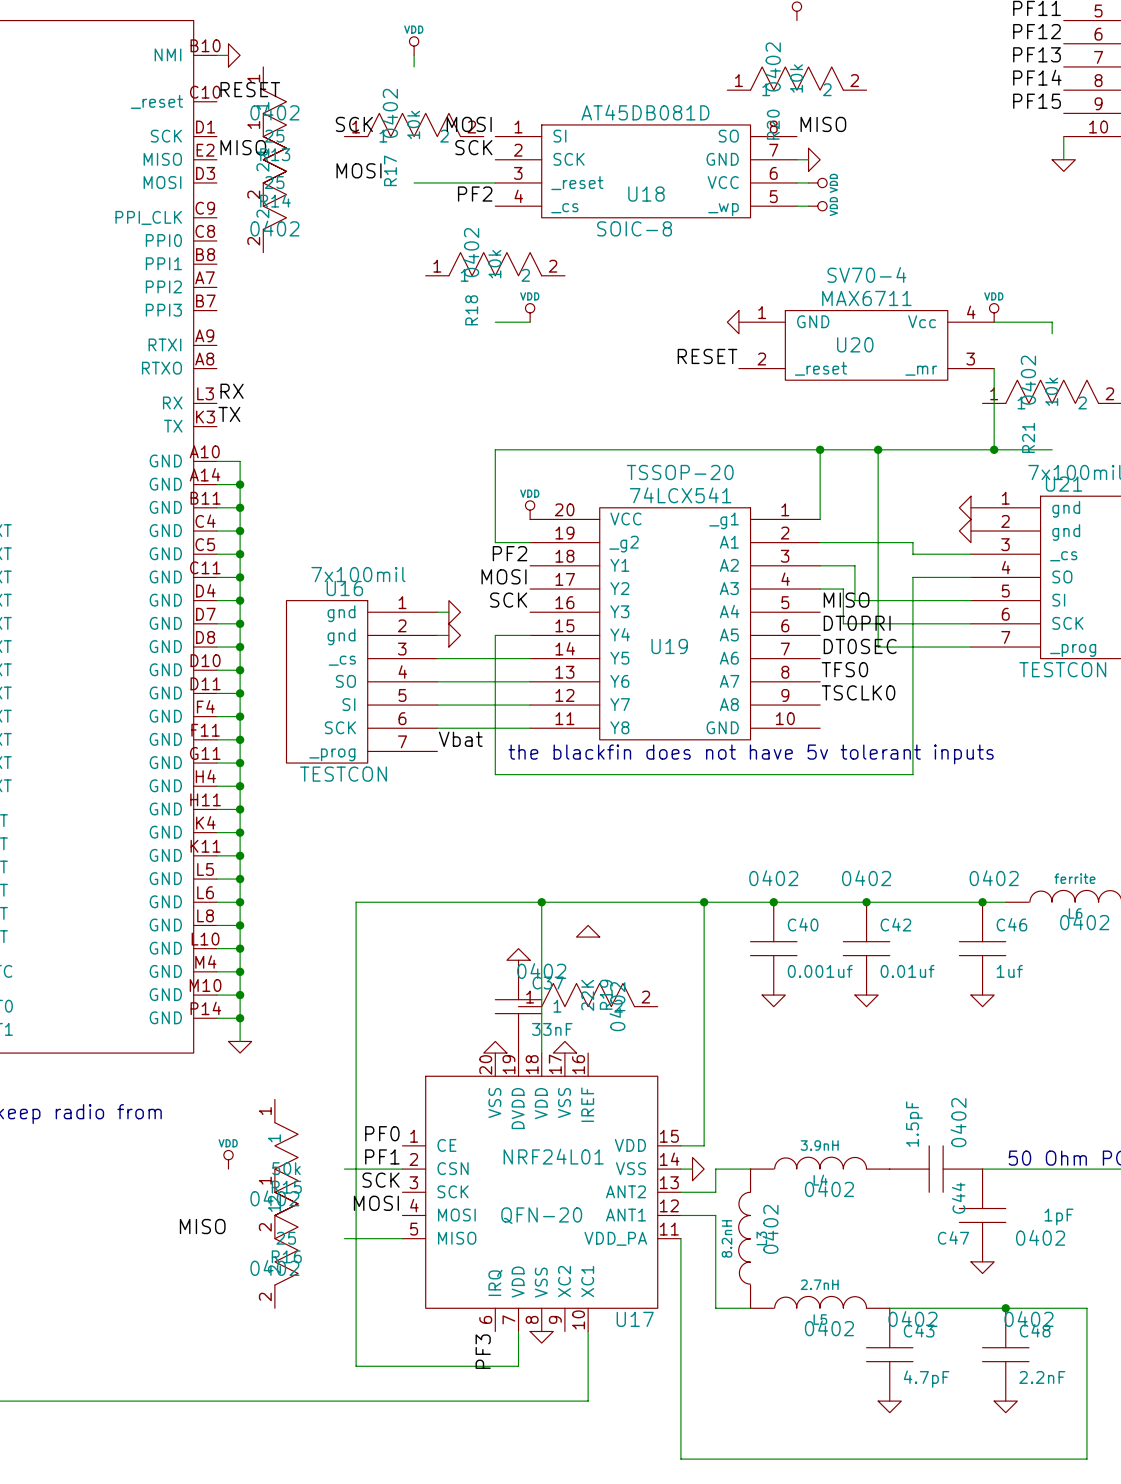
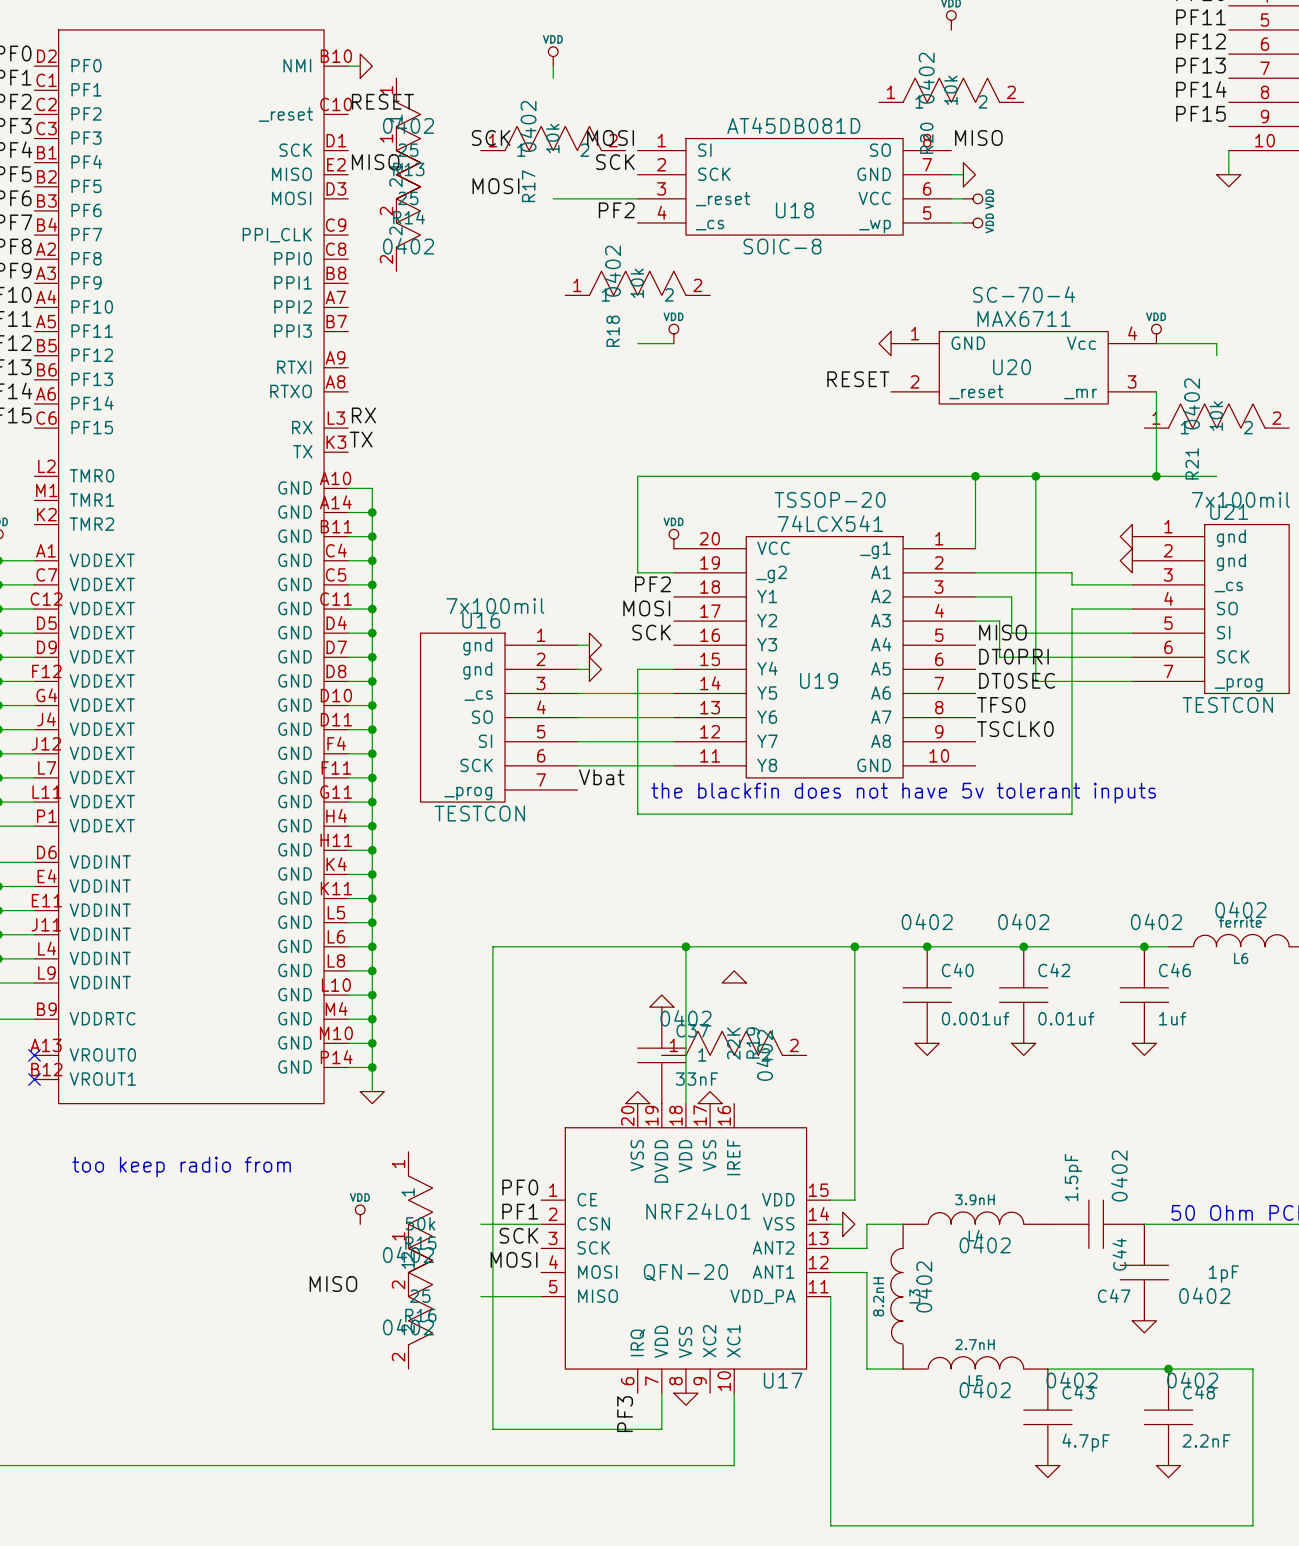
U20 text: SV70-4 (866, 274) -> SC-70-4 (1024, 294)
L6 text position: 0402 (1084, 922) -> 0402 (1240, 909)

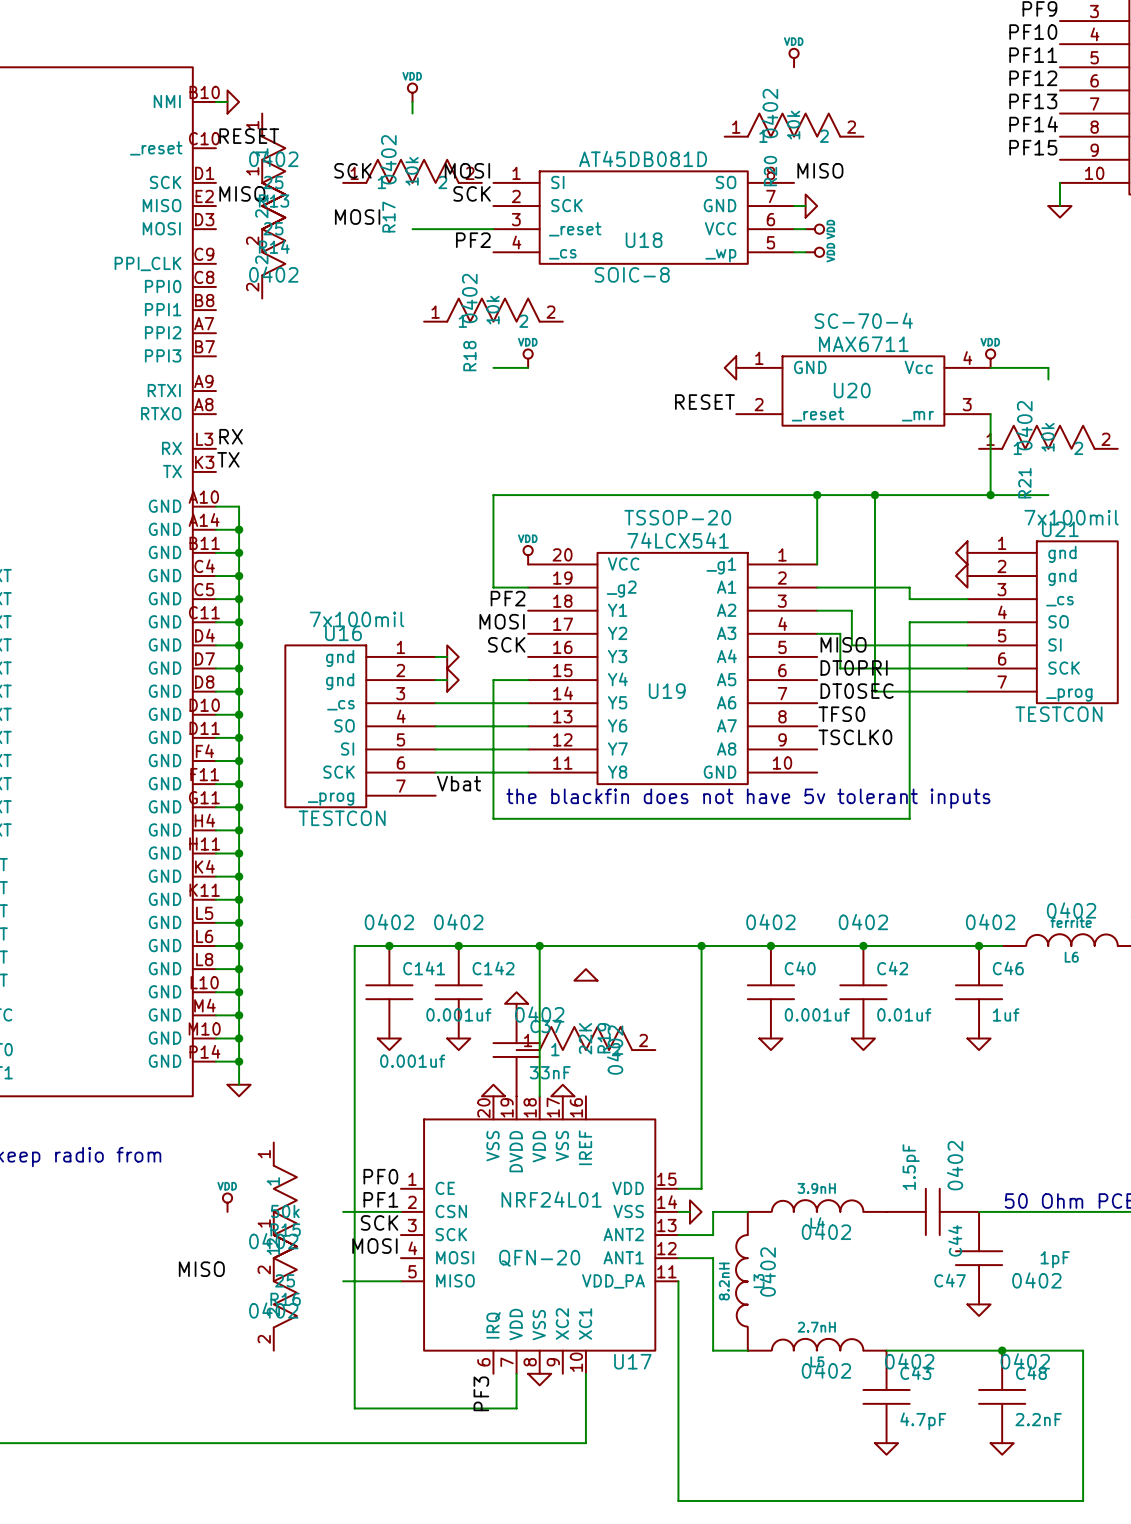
junction: none -> (389, 945)
junction: none -> (458, 945)
C141: none -> 0.001uf (389, 992)
C142: none -> 0.001uf (458, 992)
power symbol: none -> (389, 1044)
power symbol: none -> (458, 1044)

